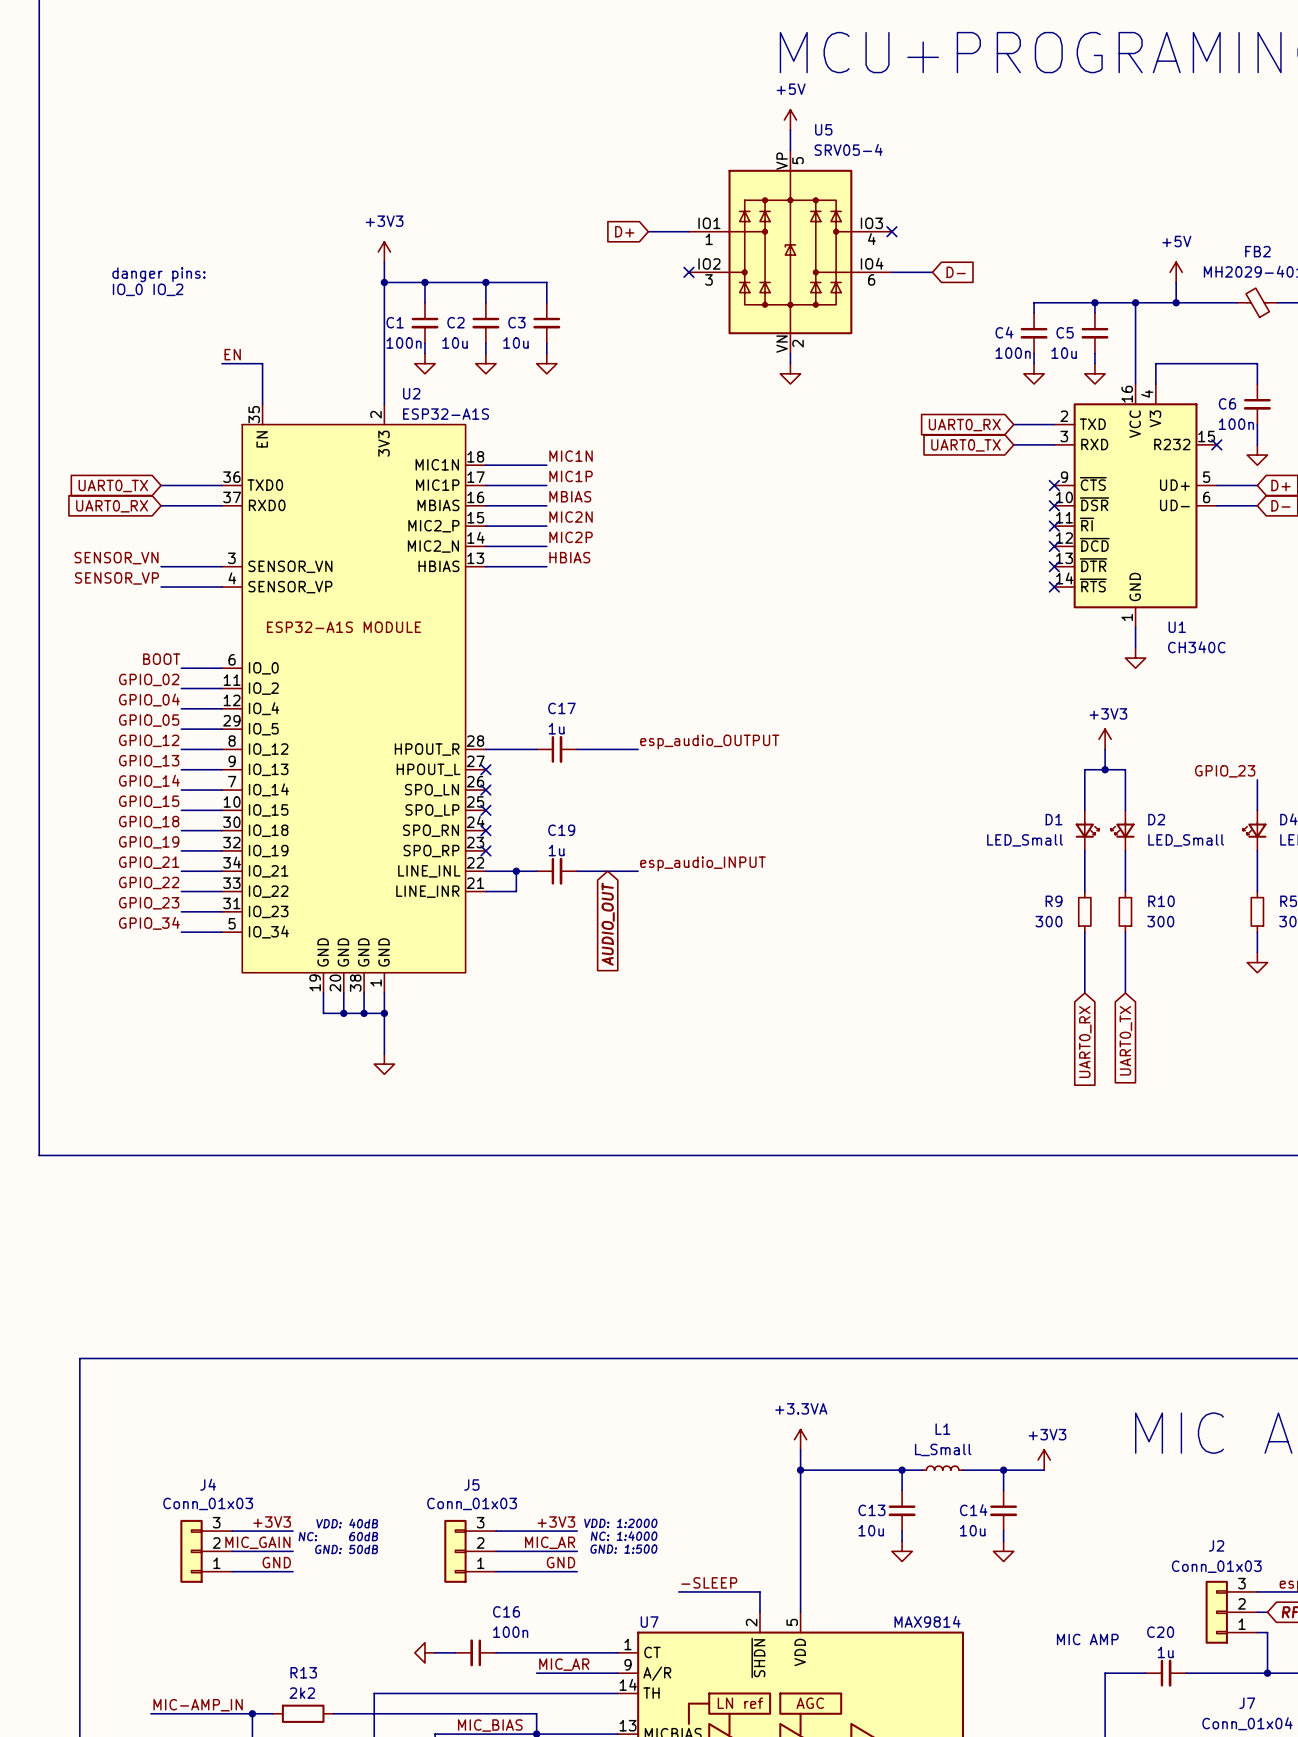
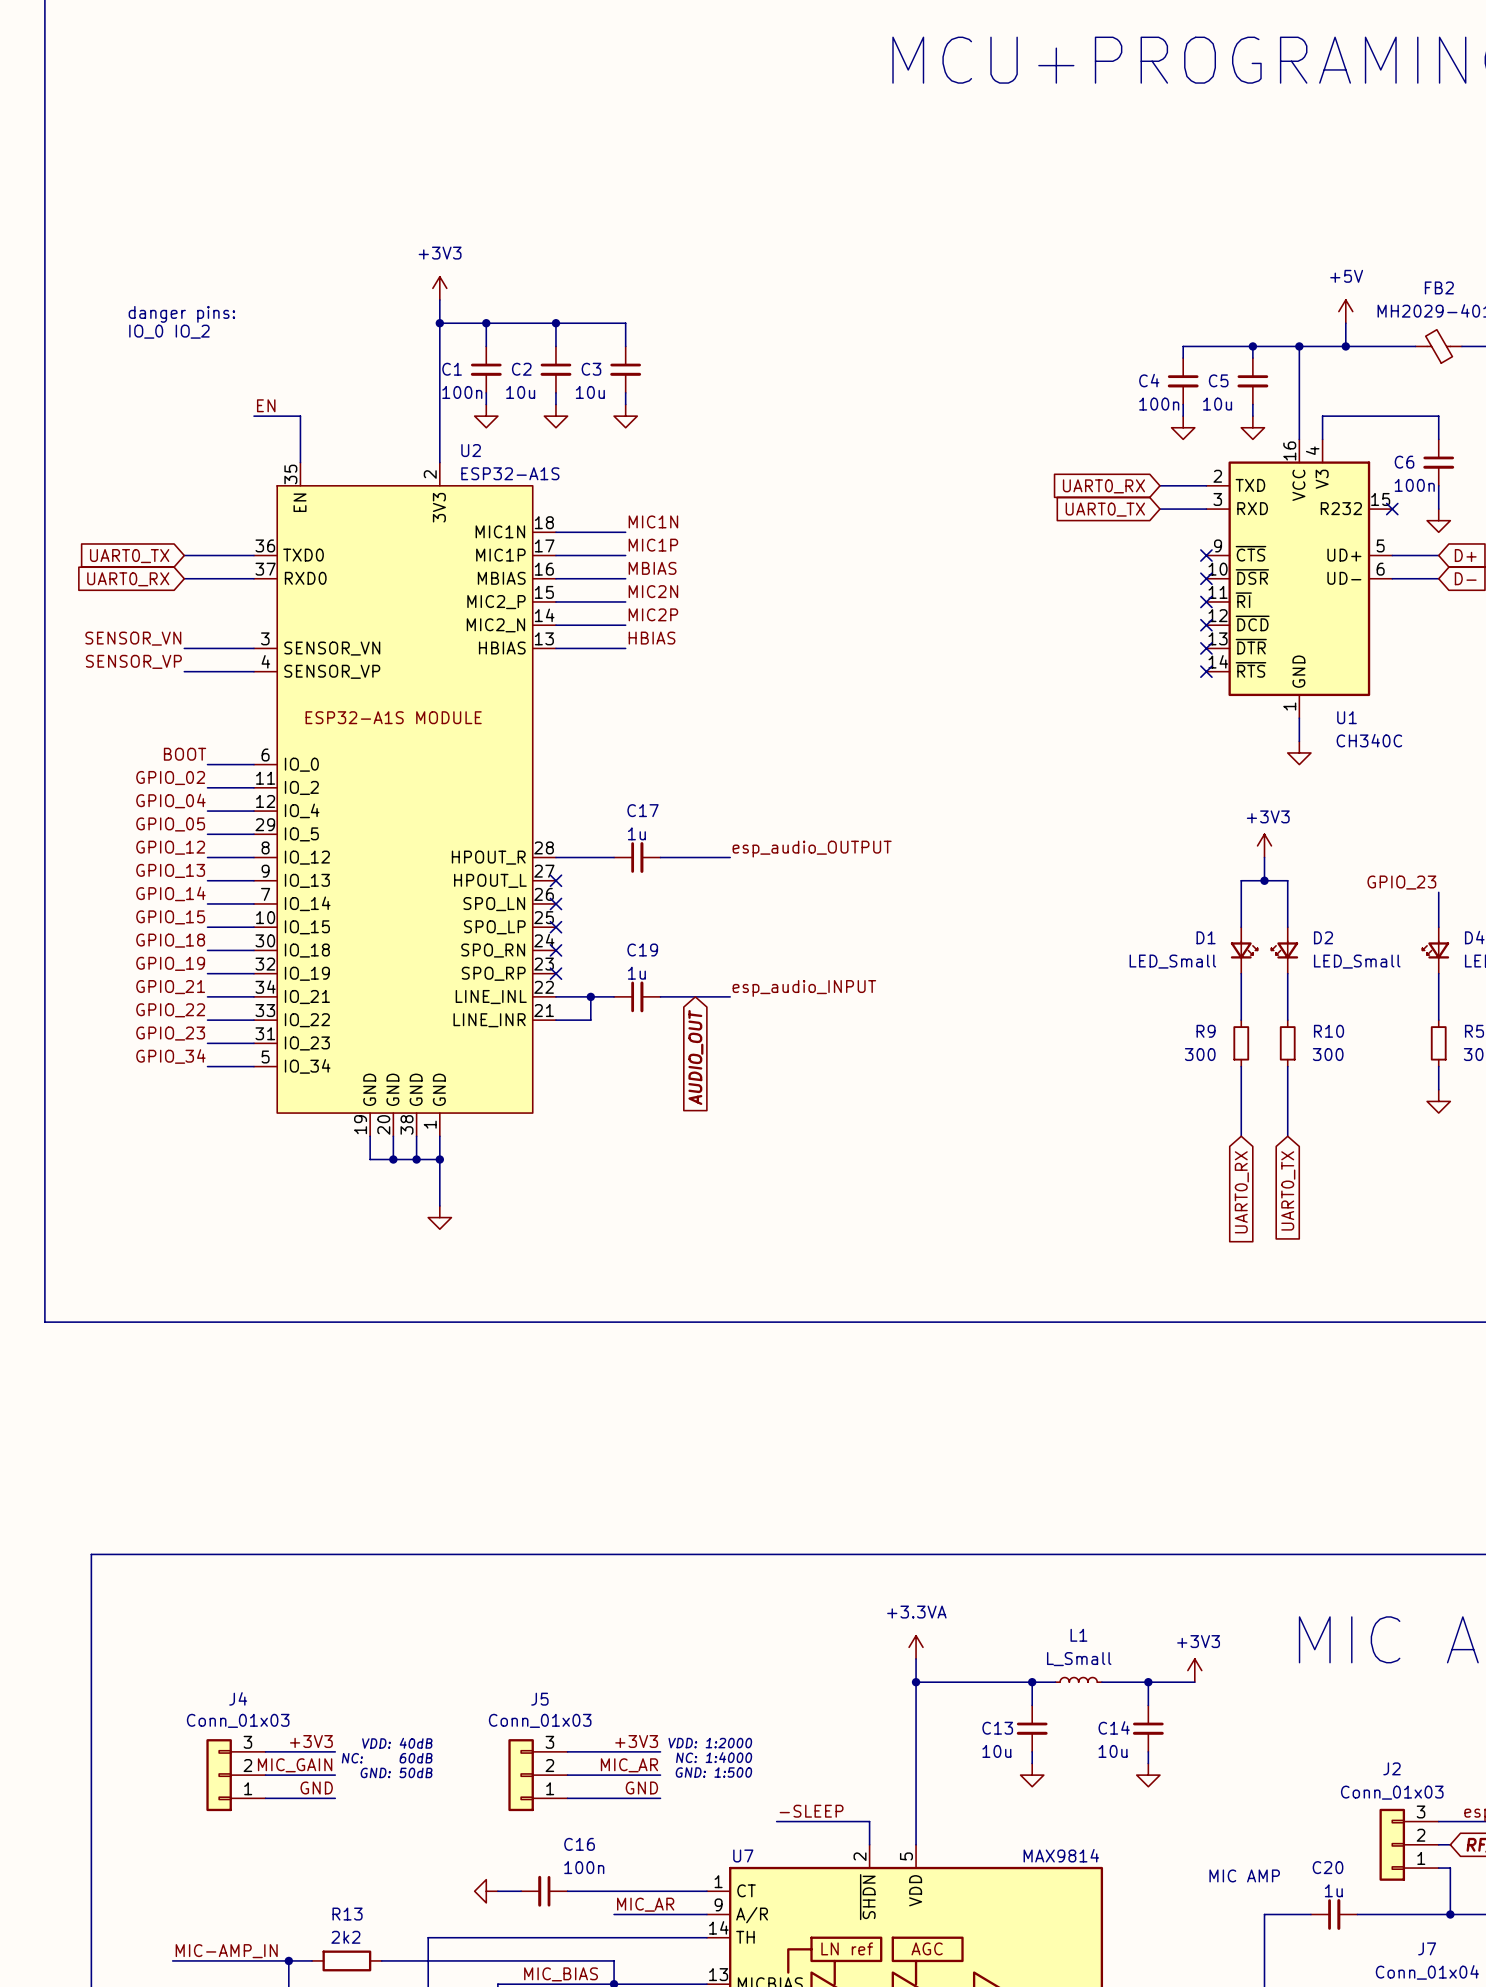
power symbol: +5V (790, 120) -> none
wire: (790, 130) (790, 150) -> none
global label: D+ (624, 231) -> none
wire: (648, 231) (688, 231) -> none
no-connect mark: (891, 231) -> none
U5: SRV05-4 (790, 252) -> none
no-connect mark: (688, 272) -> none
wire: (891, 272) (932, 272) -> none
global label: D- (956, 272) -> none
wire: (790, 353) (790, 363) -> none
power symbol: (790, 373) -> none

